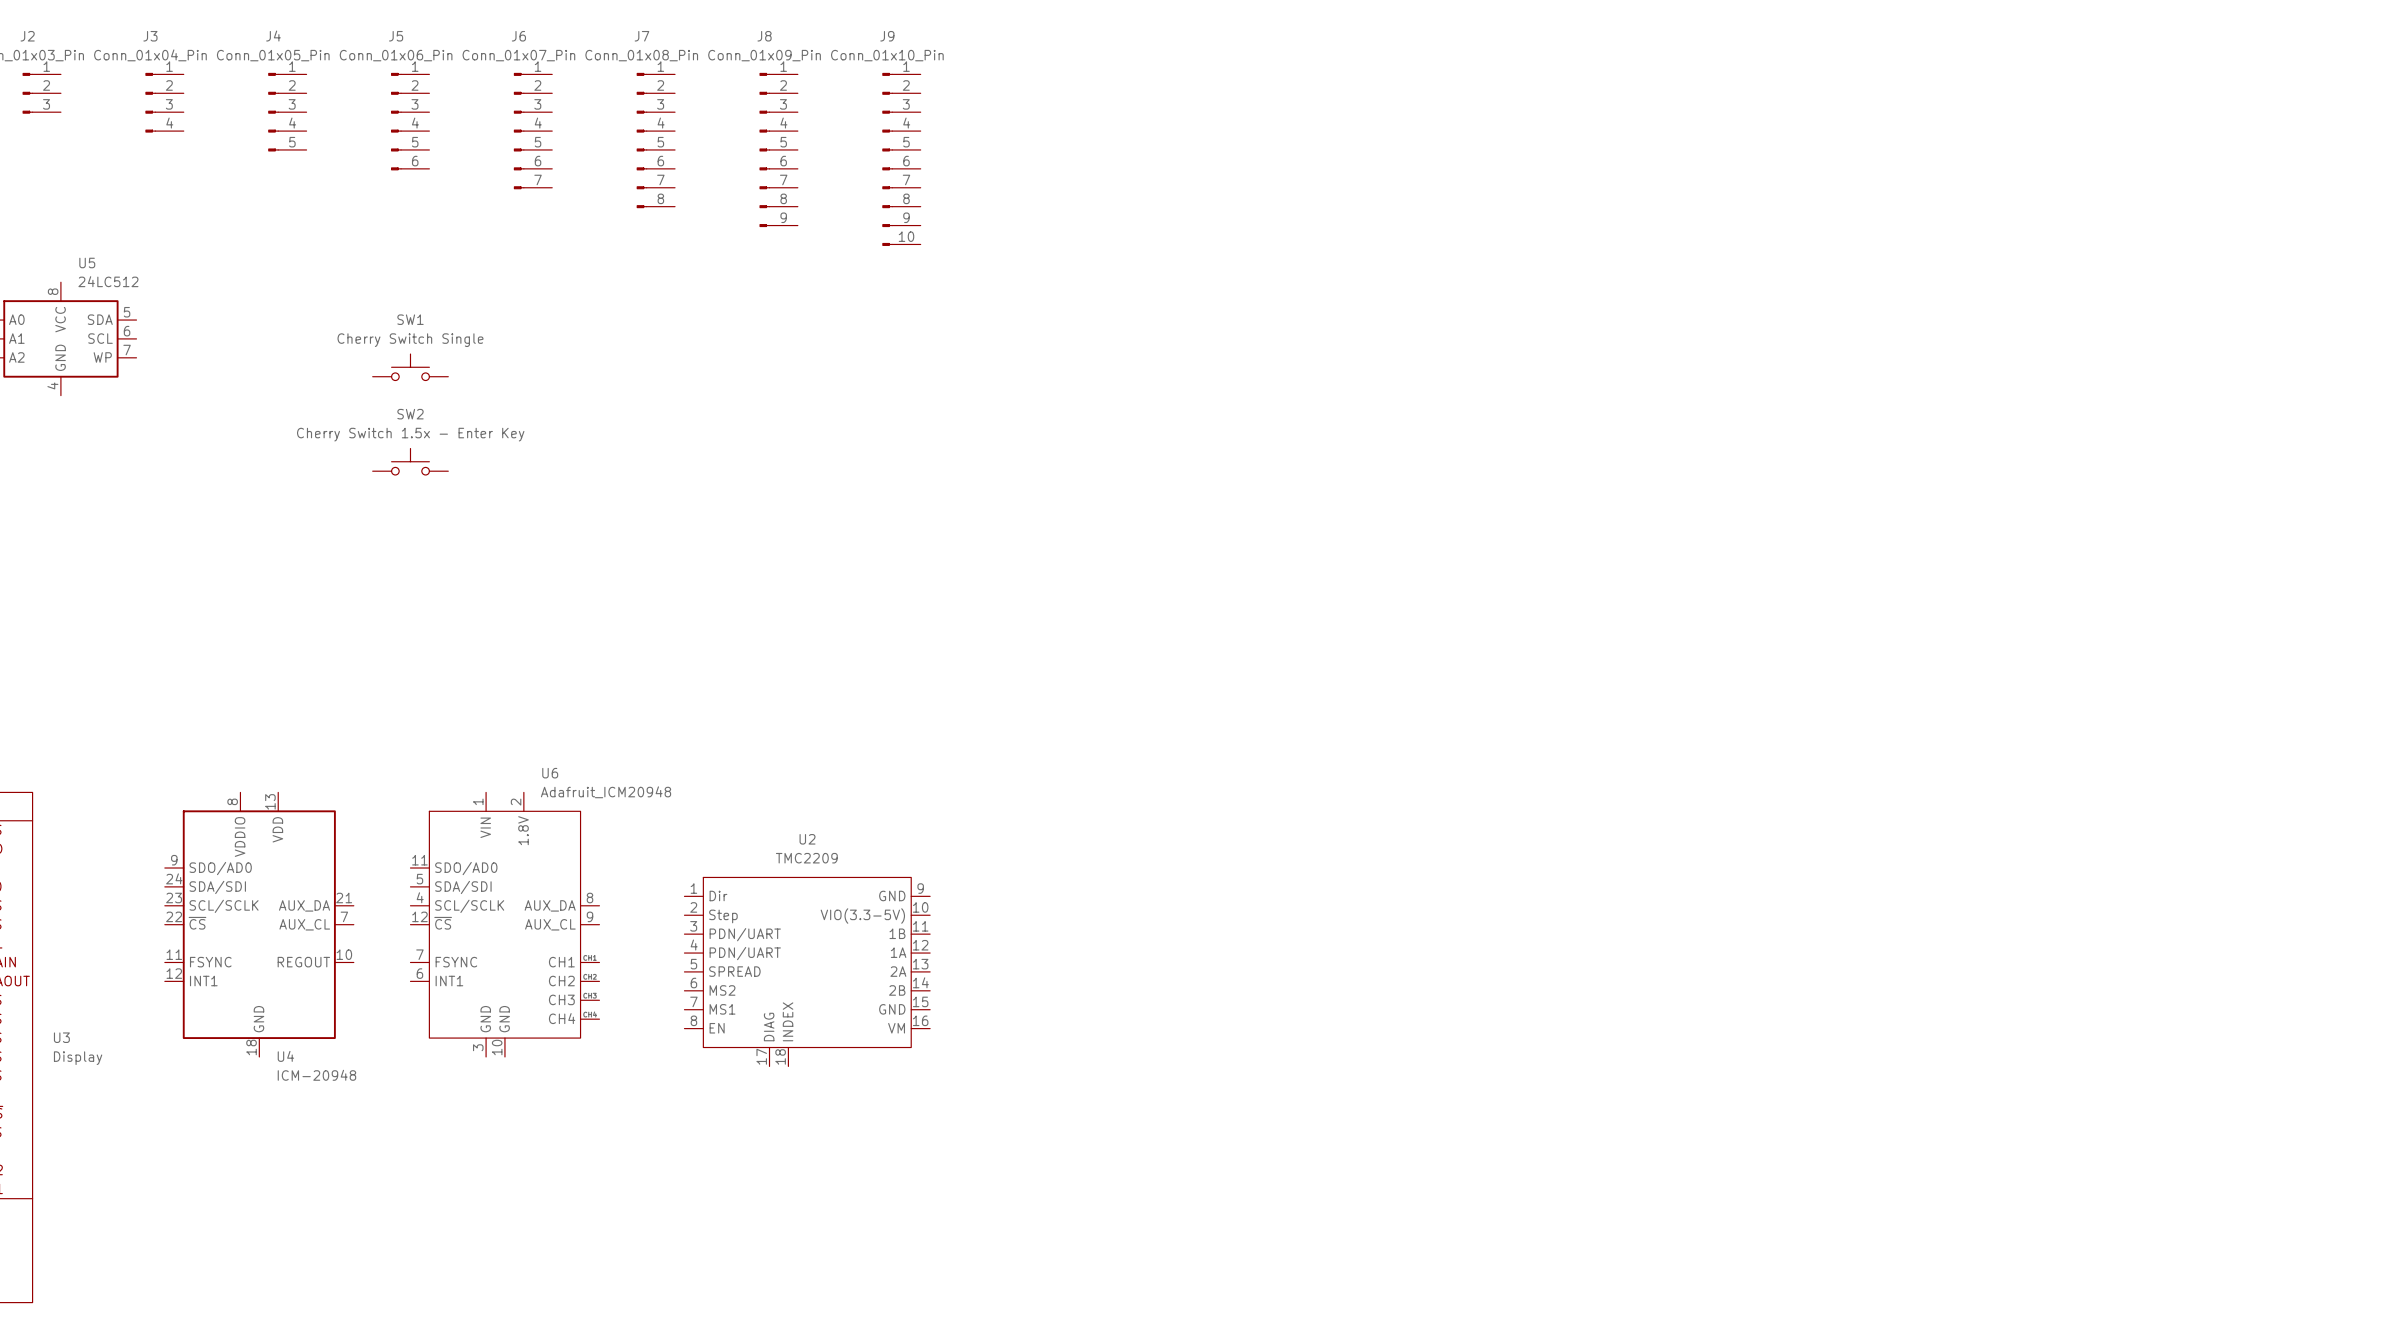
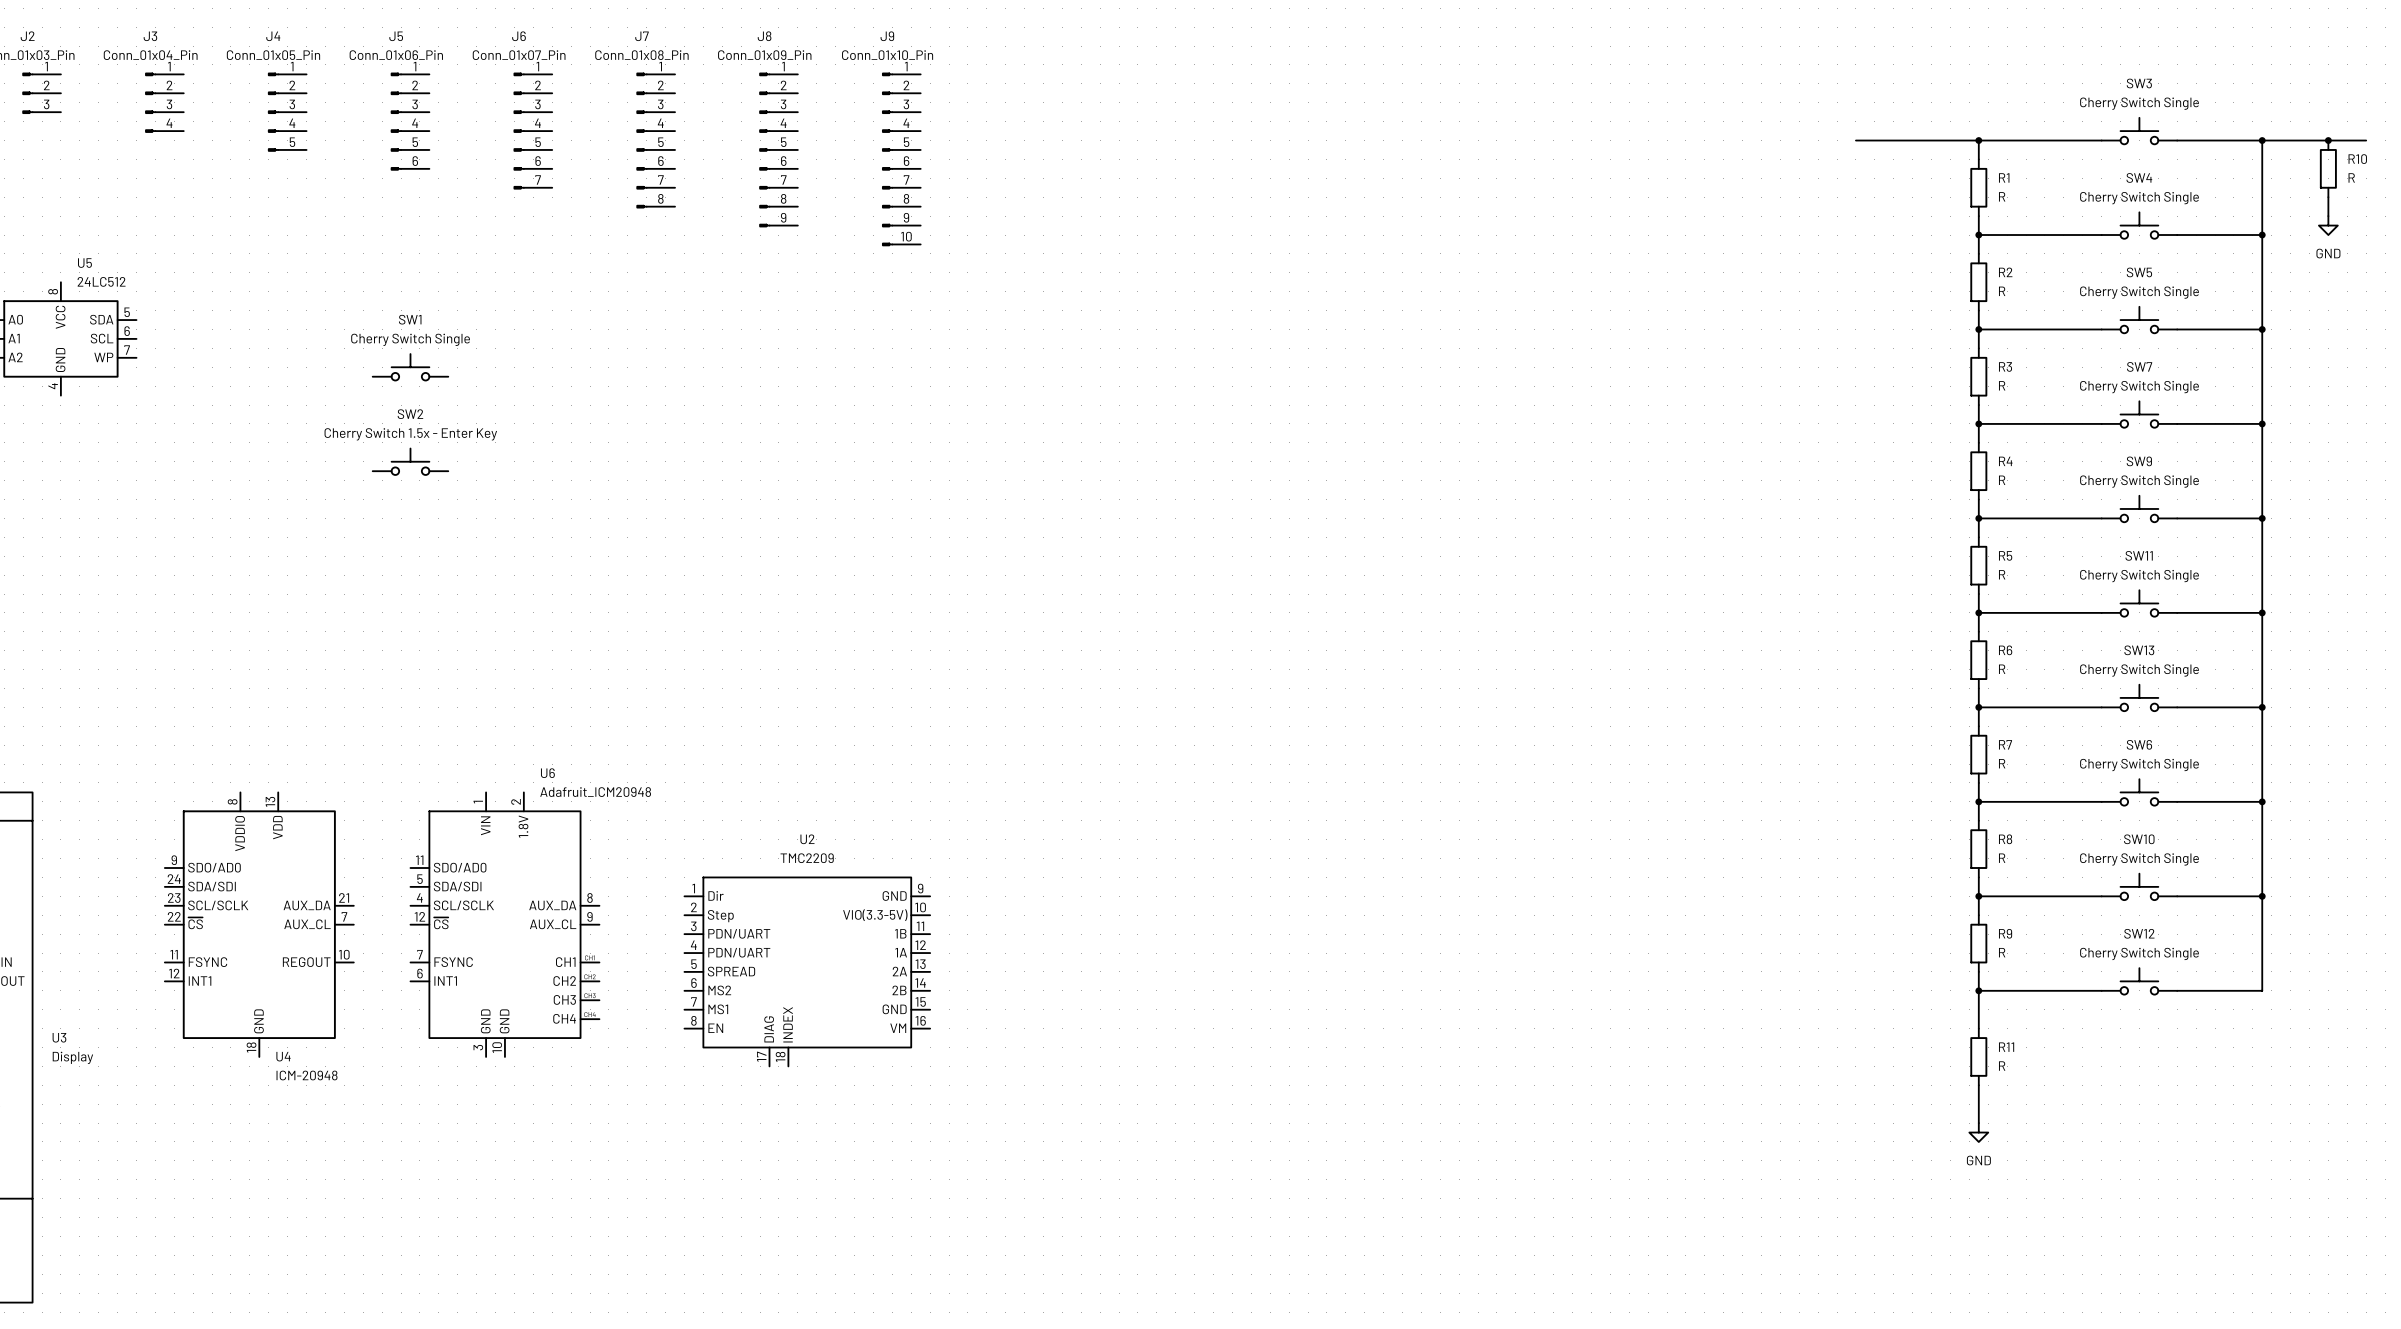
SW3: none -> Cherry Switch Single (2139, 131)
wire: none -> (1855, 140) (2101, 140)
wire: none -> (1978, 140) (1978, 159)
junction: none -> (1978, 140)
wire: none -> (2177, 140) (2366, 140)
wire: none -> (2262, 140) (2262, 990) (2177, 990)
junction: none -> (2262, 140)
junction: none -> (2328, 140)
R10: none -> R (2328, 168)
R1: none -> R (1978, 187)
wire: none -> (2328, 197) (2328, 216)
wire: none -> (1978, 216) (1978, 253)
SW4: none -> Cherry Switch Single (2139, 225)
power symbol: none -> GND (2328, 225)
wire: none -> (1978, 235) (2101, 235)
junction: none -> (1978, 235)
wire: none -> (2177, 235) (2262, 235)
junction: none -> (2262, 235)
R2: none -> R (1978, 282)
wire: none -> (1978, 310) (1978, 348)
SW5: none -> Cherry Switch Single (2139, 320)
wire: none -> (1978, 329) (2101, 329)
junction: none -> (1978, 329)
wire: none -> (2177, 329) (2262, 329)
junction: none -> (2262, 329)
R3: none -> R (1978, 376)
wire: none -> (1978, 405) (1978, 442)
SW7: none -> Cherry Switch Single (2139, 414)
wire: none -> (1978, 423) (2101, 423)
junction: none -> (1978, 423)
wire: none -> (2177, 423) (2262, 423)
junction: none -> (2262, 423)
R4: none -> R (1978, 471)
wire: none -> (1978, 499) (1978, 537)
SW9: none -> Cherry Switch Single (2139, 508)
wire: none -> (1978, 518) (2101, 518)
junction: none -> (1978, 518)
wire: none -> (2177, 518) (2262, 518)
junction: none -> (2262, 518)
R5: none -> R (1978, 565)
wire: none -> (1978, 594) (1978, 631)
SW11: none -> Cherry Switch Single (2139, 603)
wire: none -> (1978, 612) (2101, 612)
junction: none -> (1978, 612)
wire: none -> (2177, 612) (2262, 612)
junction: none -> (2262, 612)
R6: none -> R (1978, 660)
wire: none -> (1978, 688) (1978, 726)
SW13: none -> Cherry Switch Single (2139, 697)
wire: none -> (1978, 707) (2101, 707)
junction: none -> (1978, 707)
wire: none -> (2177, 707) (2262, 707)
junction: none -> (2262, 707)
R7: none -> R (1978, 754)
wire: none -> (1978, 782) (1978, 820)
SW6: none -> Cherry Switch Single (2139, 792)
wire: none -> (1978, 801) (2101, 801)
junction: none -> (1978, 801)
wire: none -> (2177, 801) (2262, 801)
junction: none -> (2262, 801)
R8: none -> R (1978, 849)
wire: none -> (1978, 877) (1978, 915)
SW10: none -> Cherry Switch Single (2139, 886)
wire: none -> (1978, 896) (2101, 896)
junction: none -> (1978, 896)
wire: none -> (2177, 896) (2262, 896)
junction: none -> (2262, 896)
R9: none -> R (1978, 943)
wire: none -> (1978, 971) (1978, 1028)
SW12: none -> Cherry Switch Single (2139, 981)
wire: none -> (1978, 990) (2101, 990)
junction: none -> (1978, 990)
R11: none -> R (1978, 1056)
wire: none -> (1978, 1085) (1978, 1123)
power symbol: none -> GND (1978, 1132)

